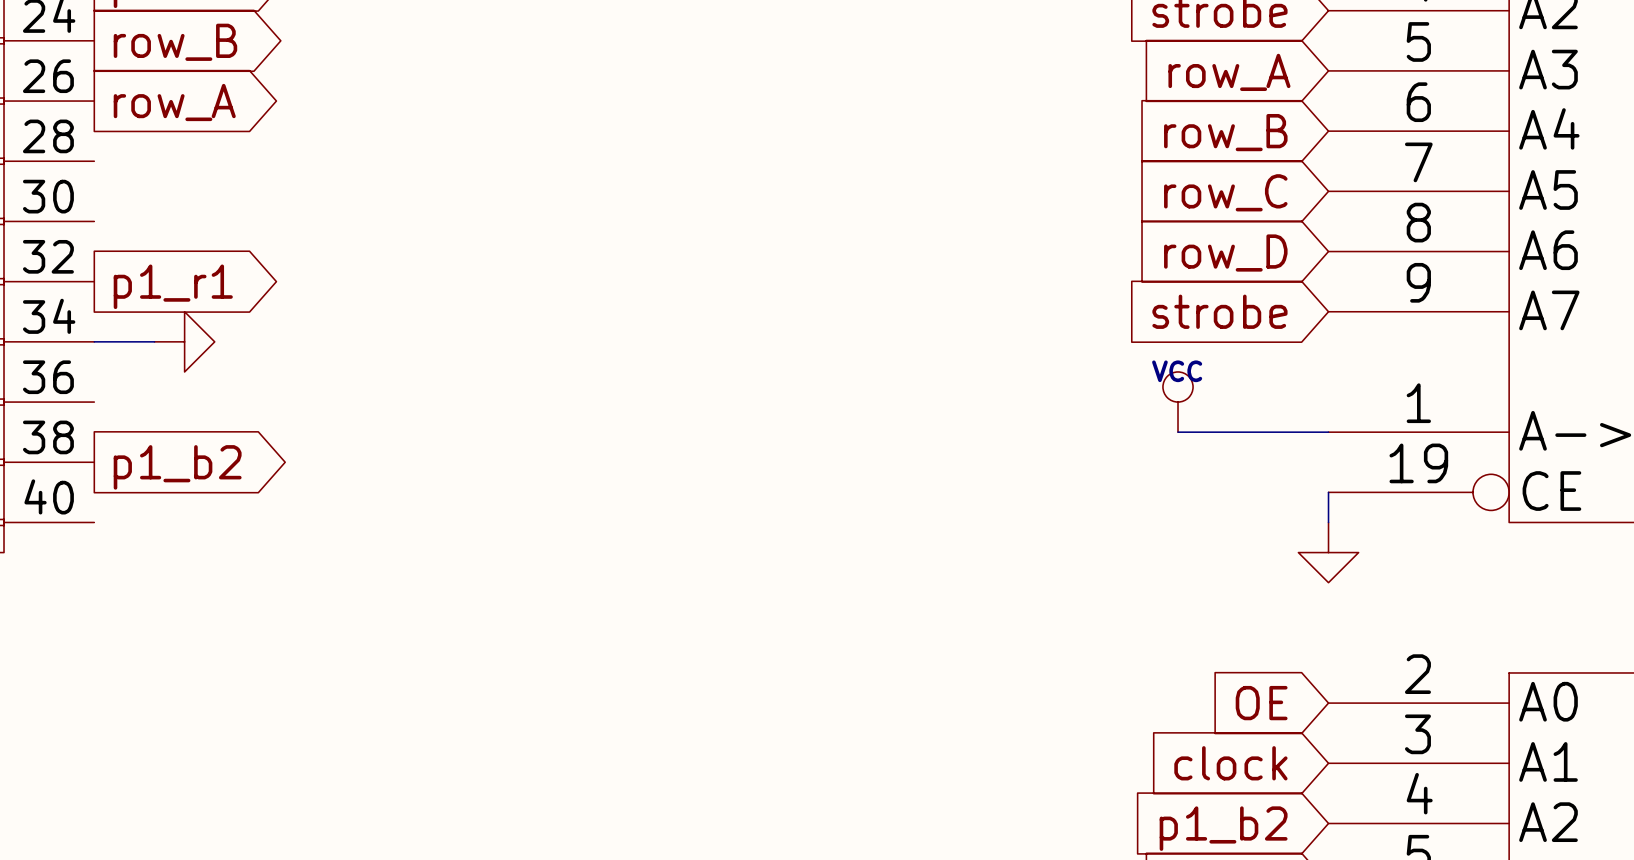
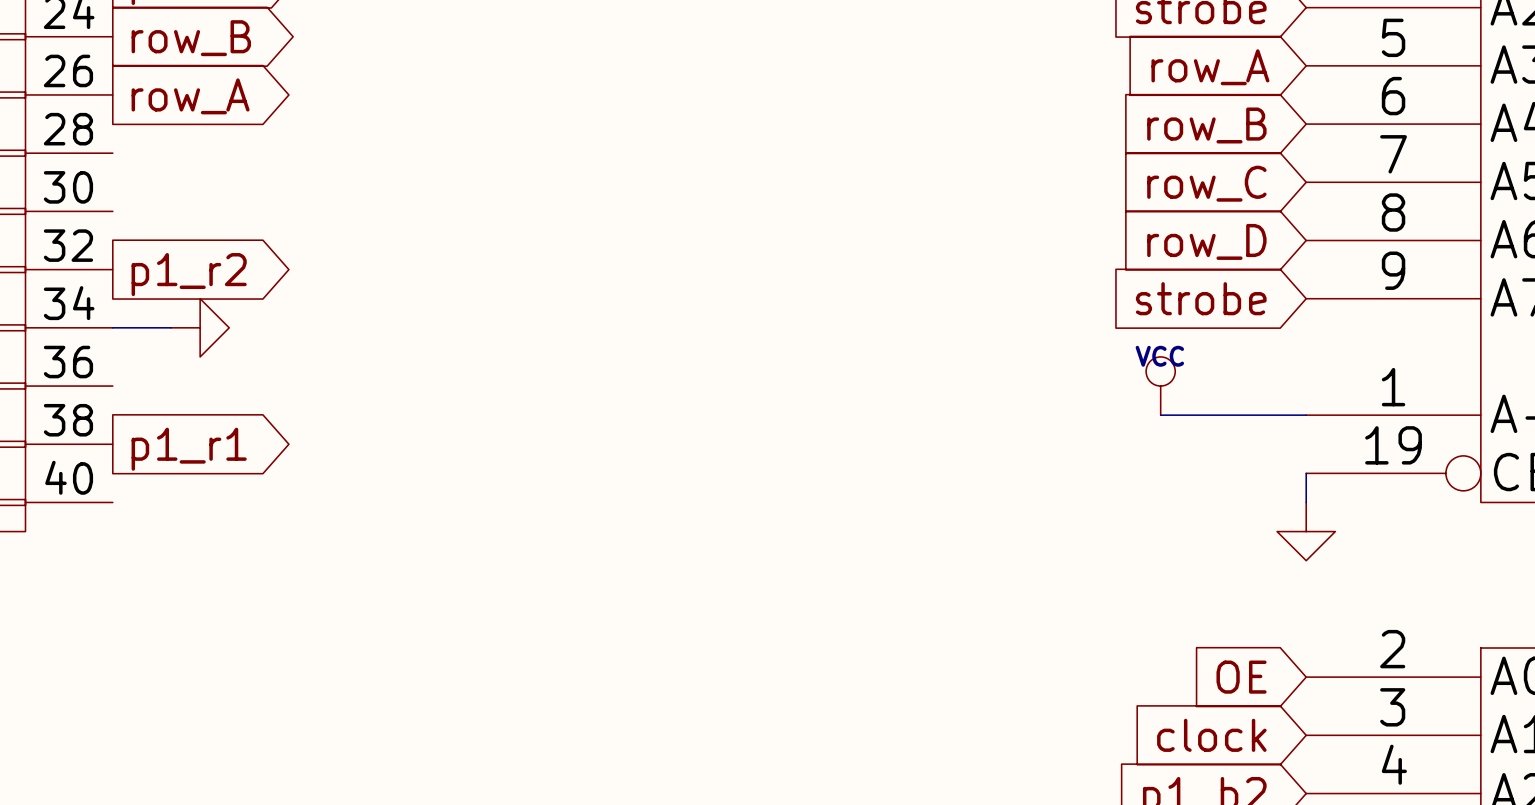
global label: p1_r1 (173, 286) -> p1_r2 (189, 274)
global label: p1_b2 (177, 467) -> p1_r1 (189, 449)

